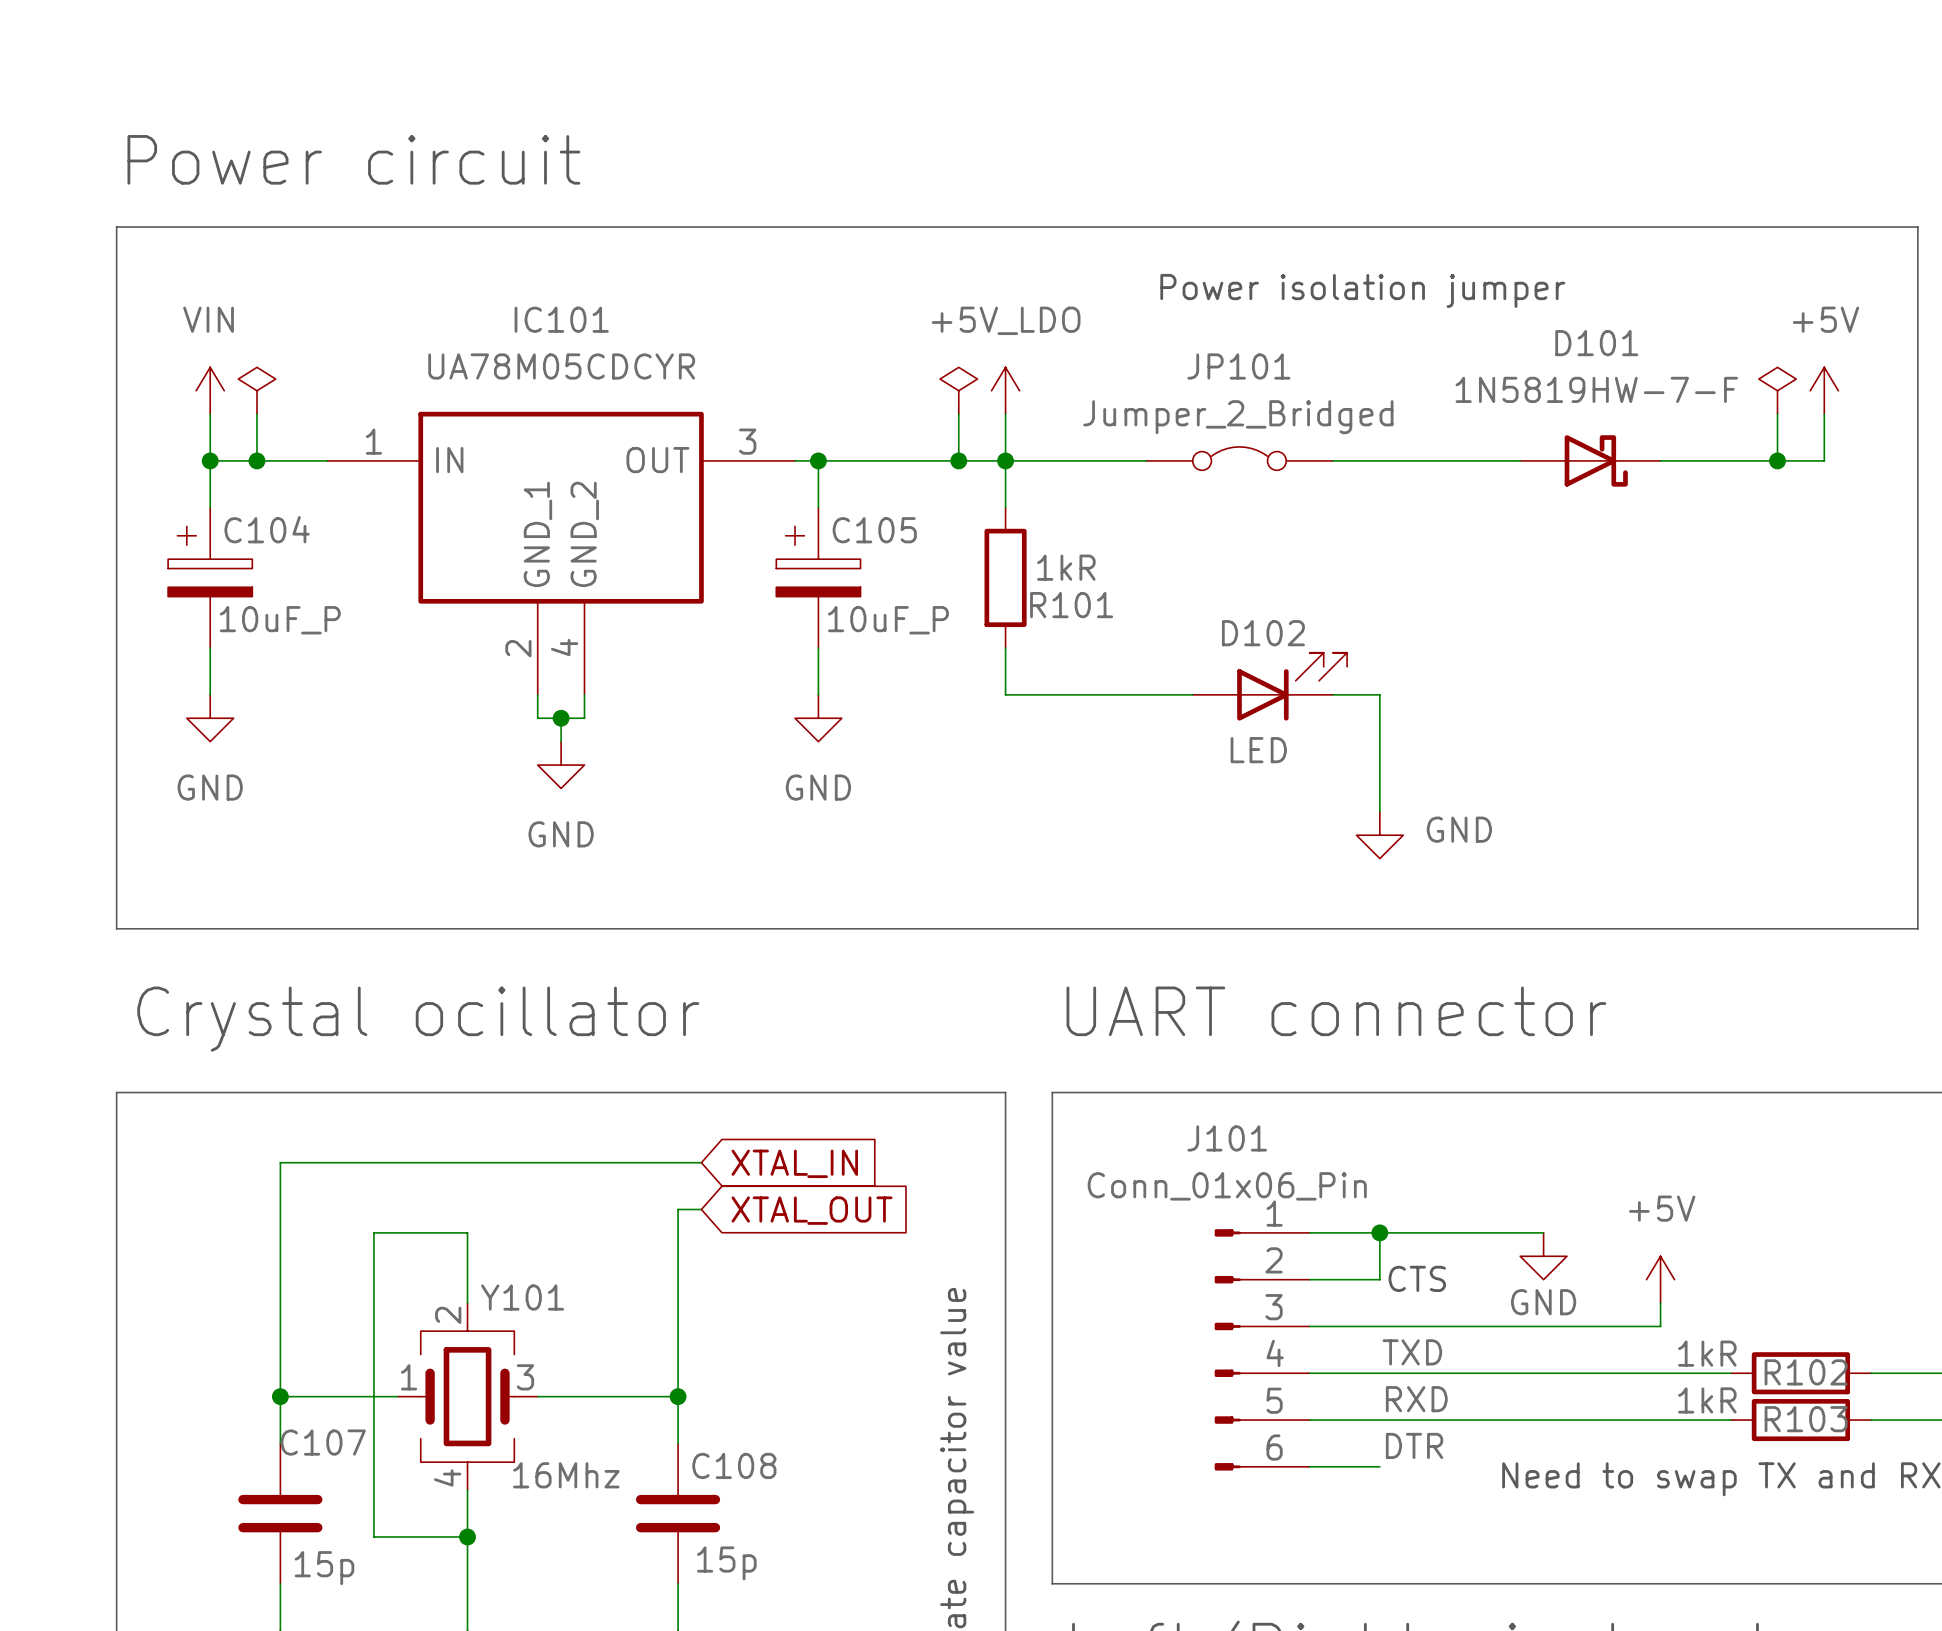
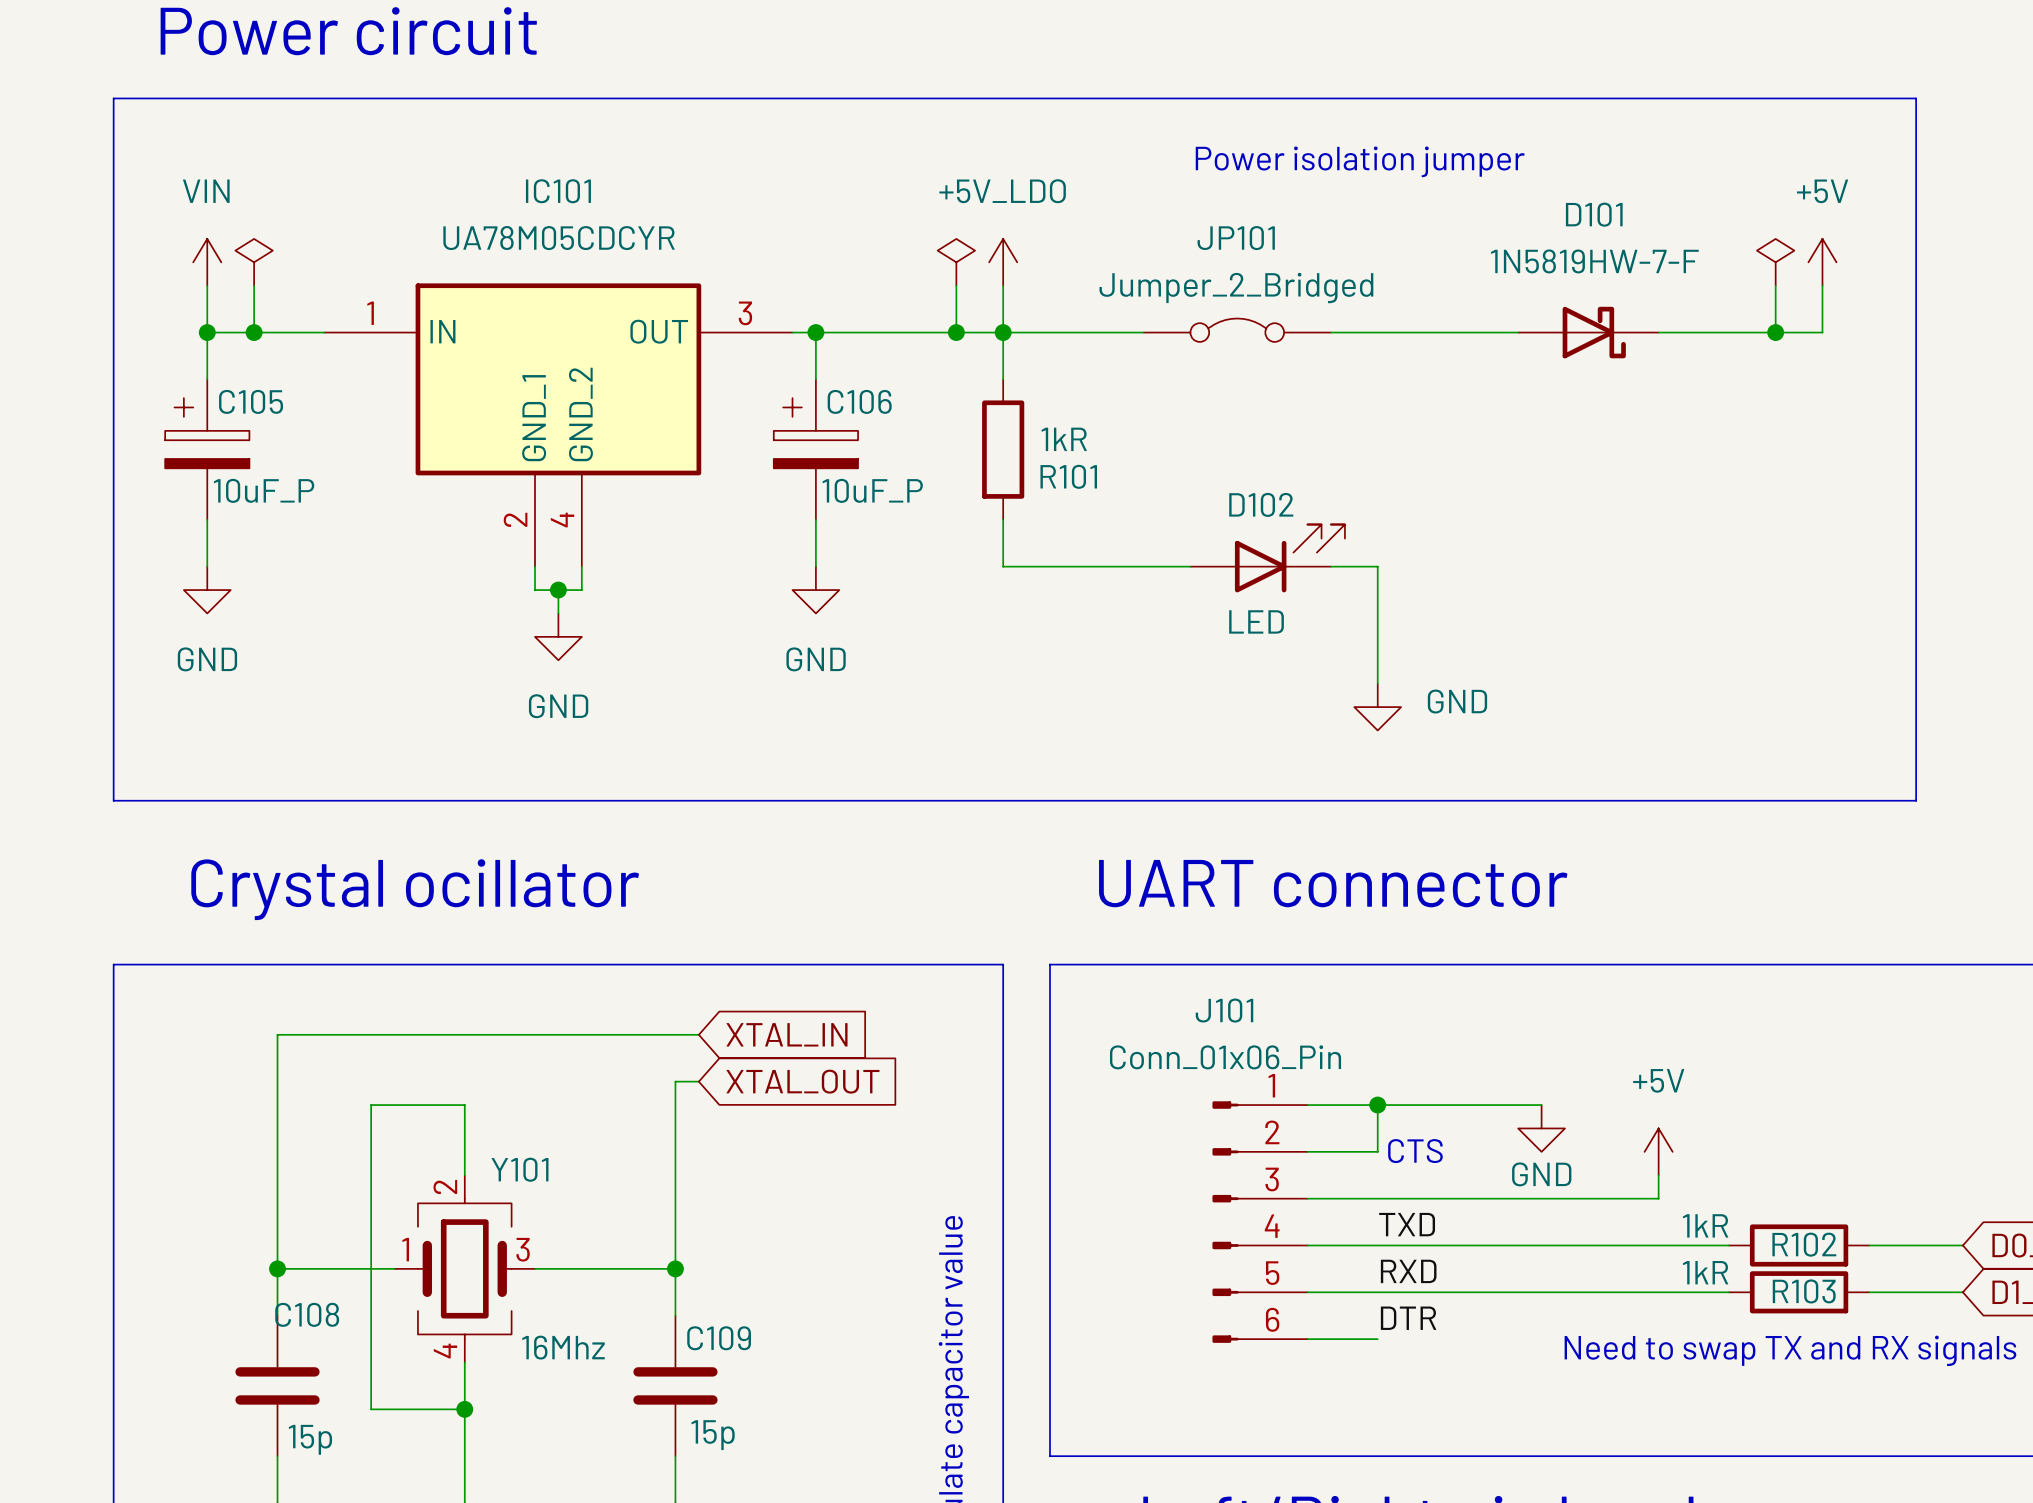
C104 name: C104 (267, 529) -> C105 (251, 401)
C105 name: C105 (874, 530) -> C106 (859, 401)
C107 name: C107 (323, 1442) -> C108 (307, 1314)
C108 name: C108 (734, 1465) -> C109 (719, 1338)

